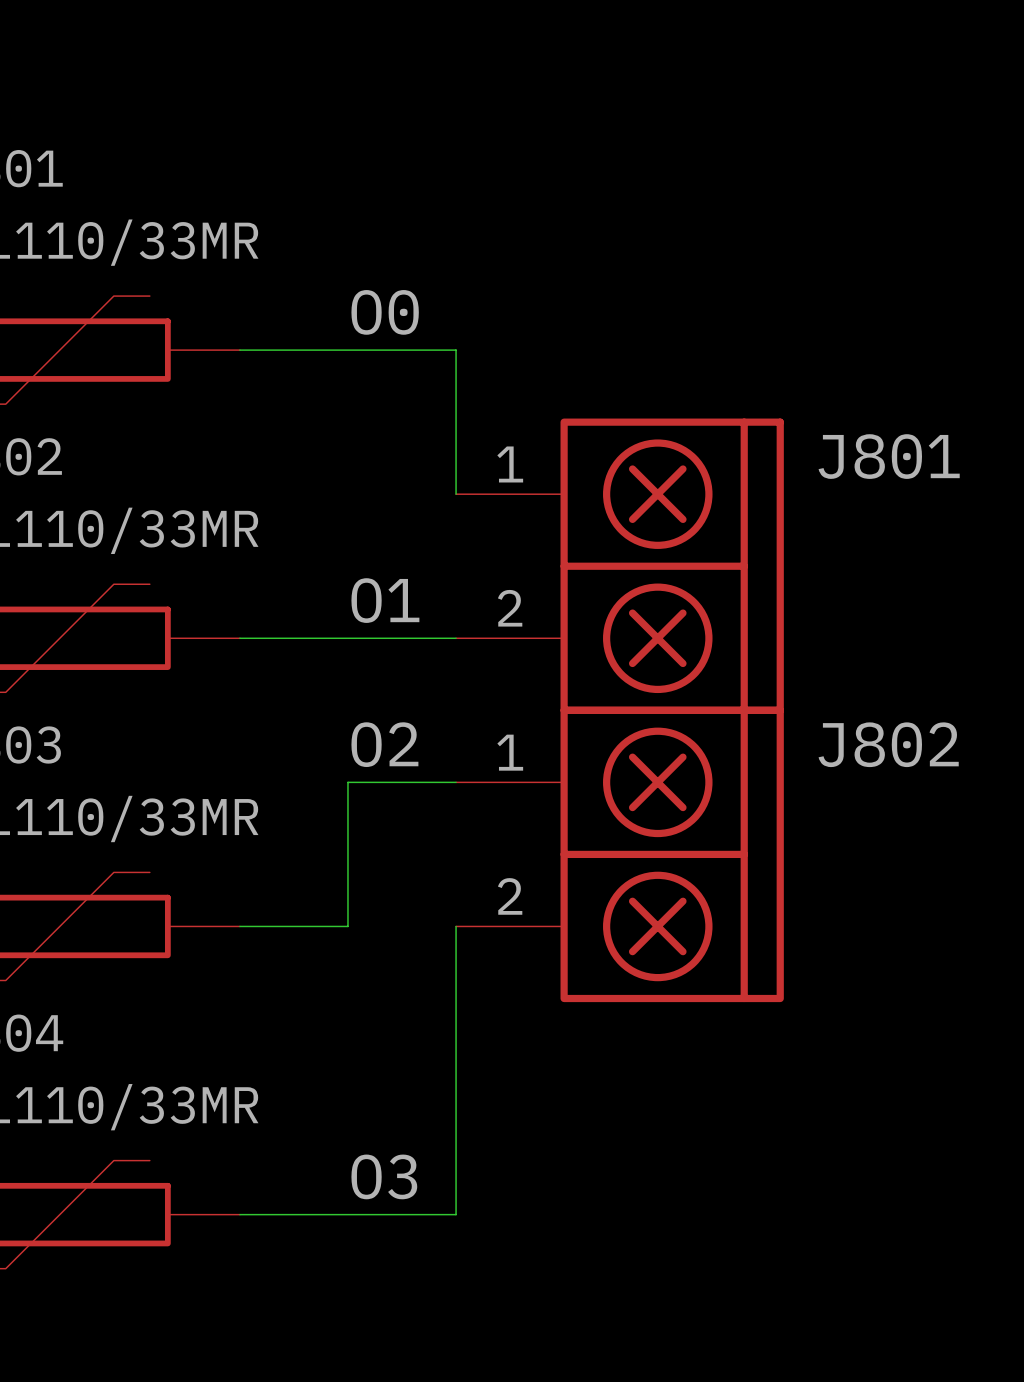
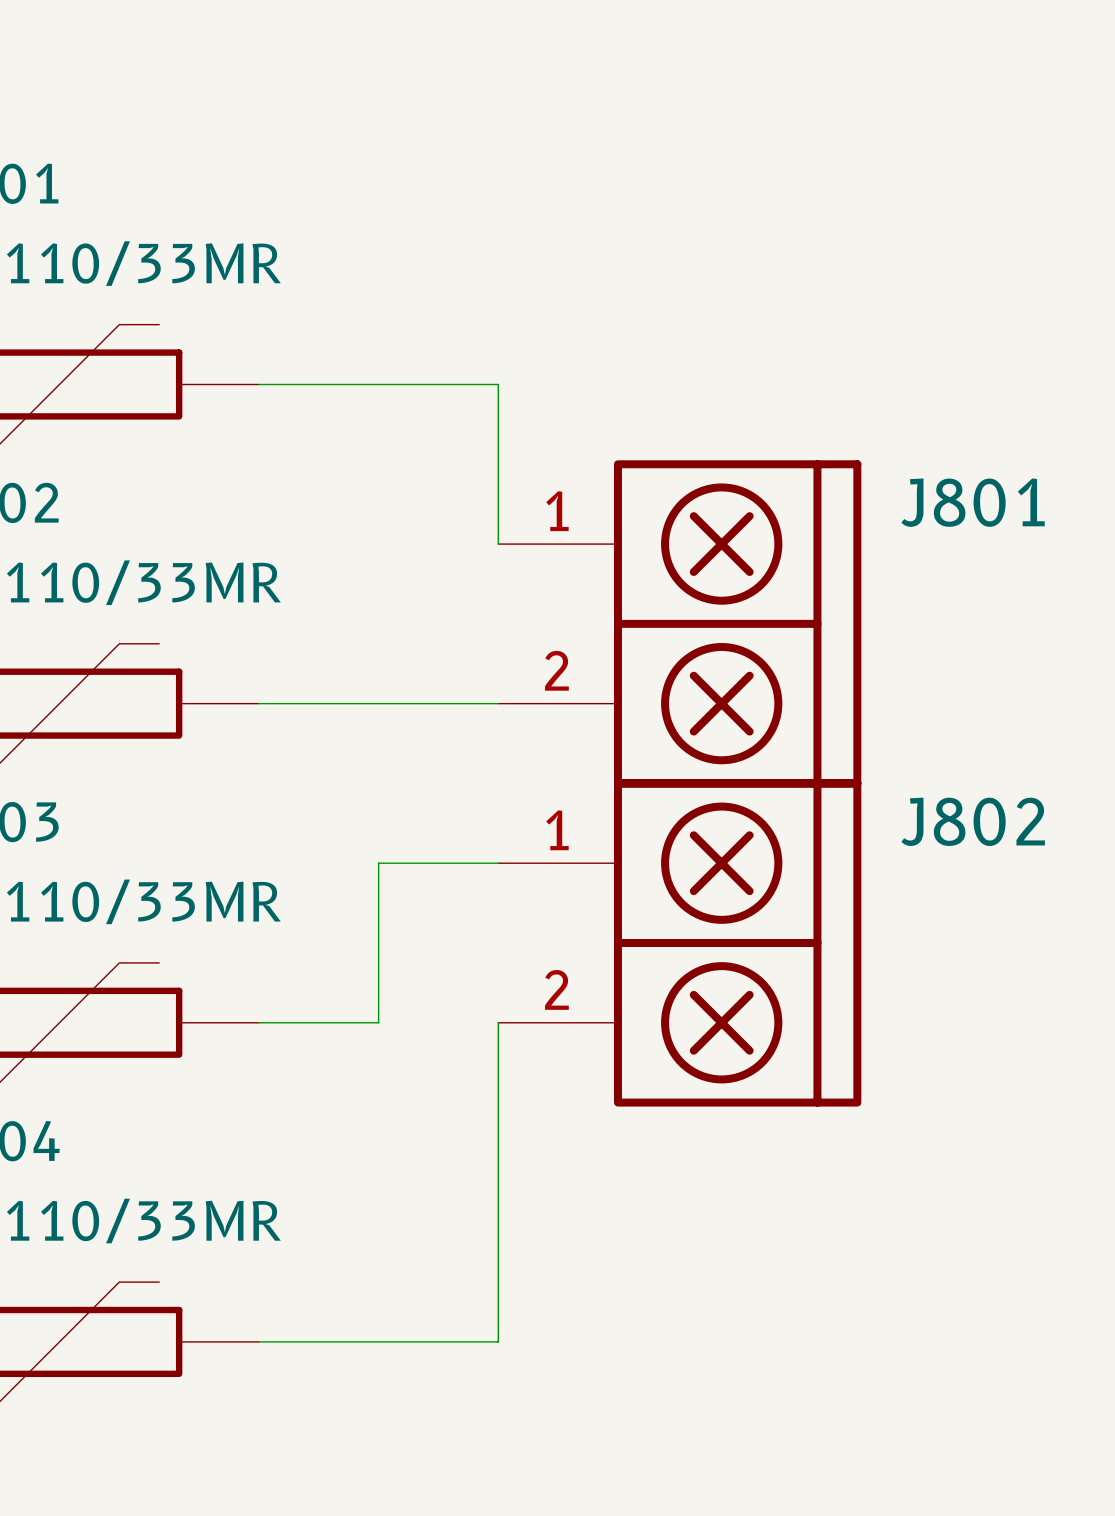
label: O0 (385, 312) -> none
label: O1 (385, 600) -> none
label: O2 (384, 744) -> none
label: O3 (384, 1176) -> none

